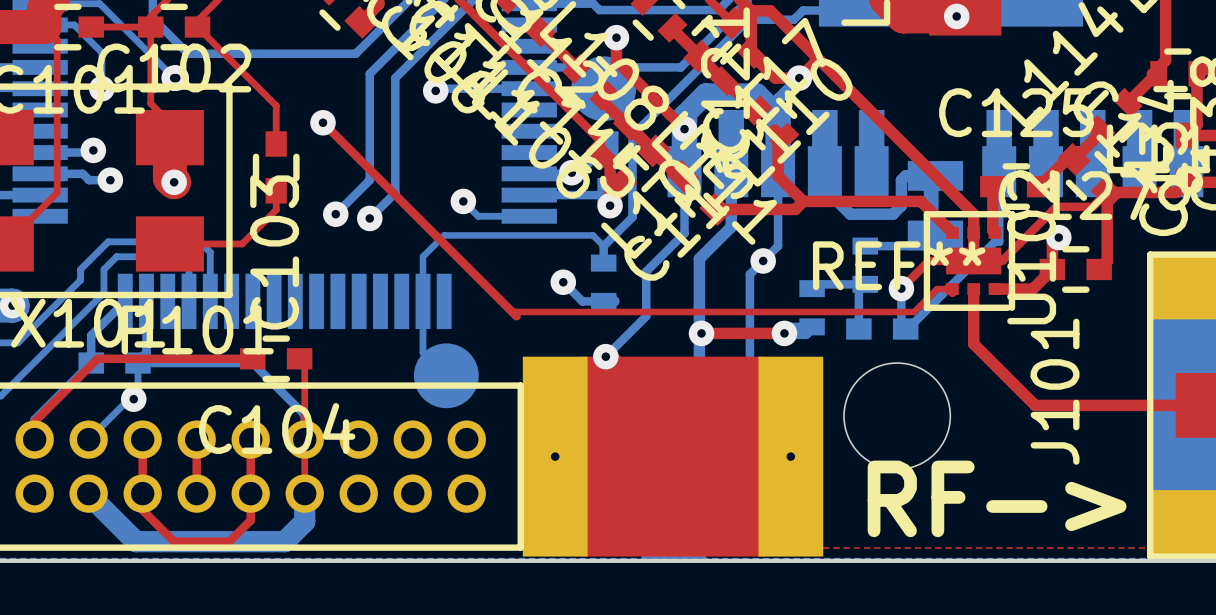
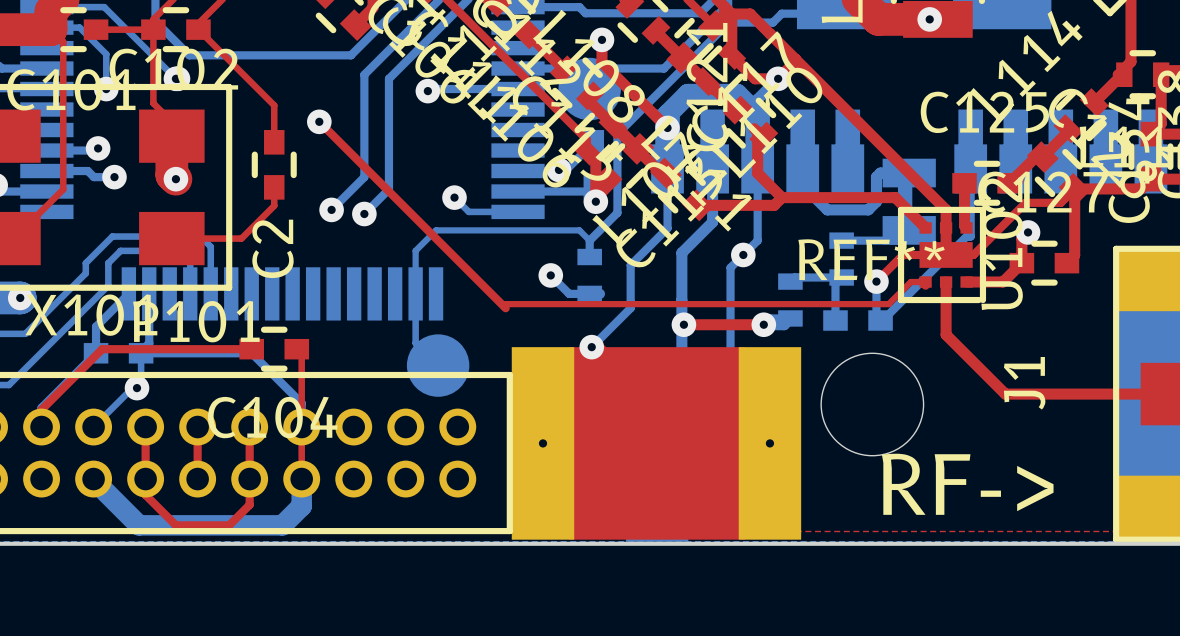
C103 name: C103 (274, 252) -> C2 (272, 248)
J101 name: J101 (1055, 391) -> J1 (1024, 383)

